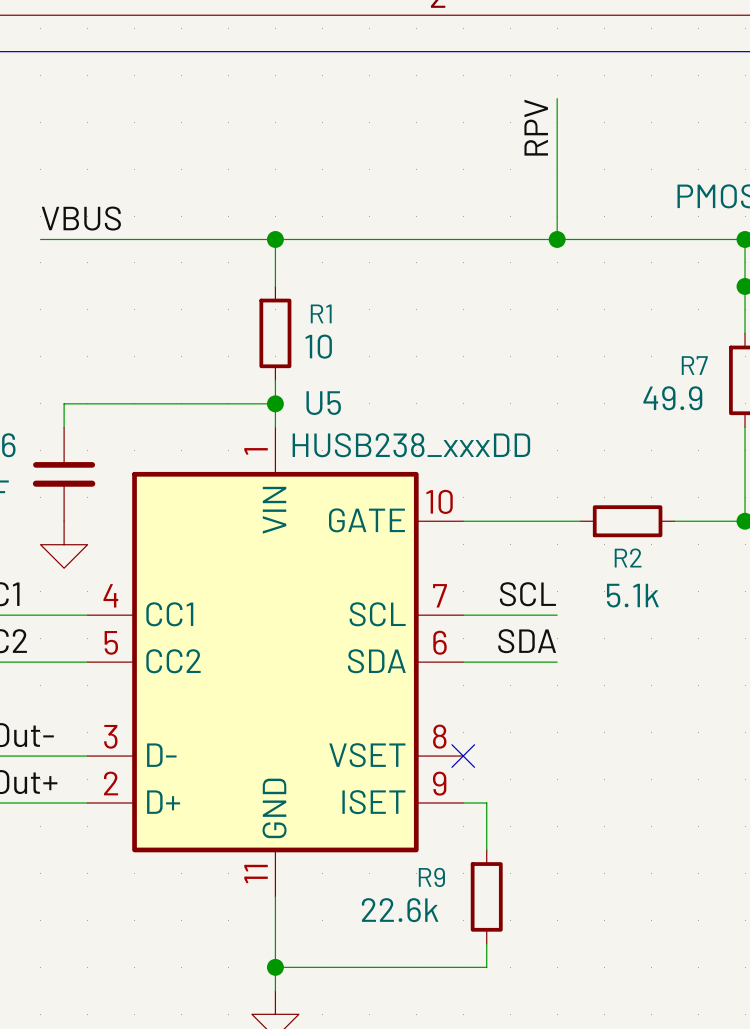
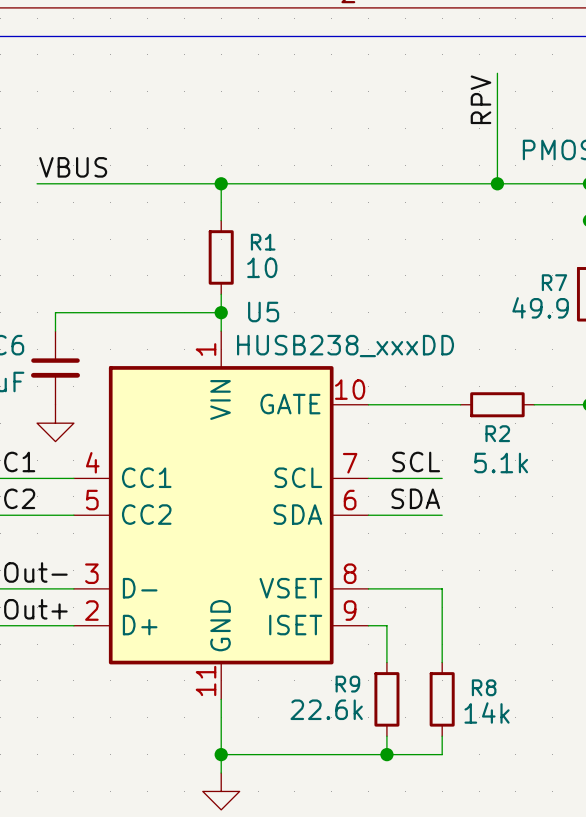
wire: (557, 98) (557, 239) -> (497, 73) (497, 183)
label position: RPV (536, 127) -> RPV (480, 99)
junction position: (557, 239) -> (497, 183)
wire: none -> (368, 588) (442, 588) (442, 662)
no-connect mark: (463, 756) -> none
R8: none -> 14k (442, 699)
wire: none -> (442, 736) (442, 754) (386, 754)
junction: none -> (386, 754)

